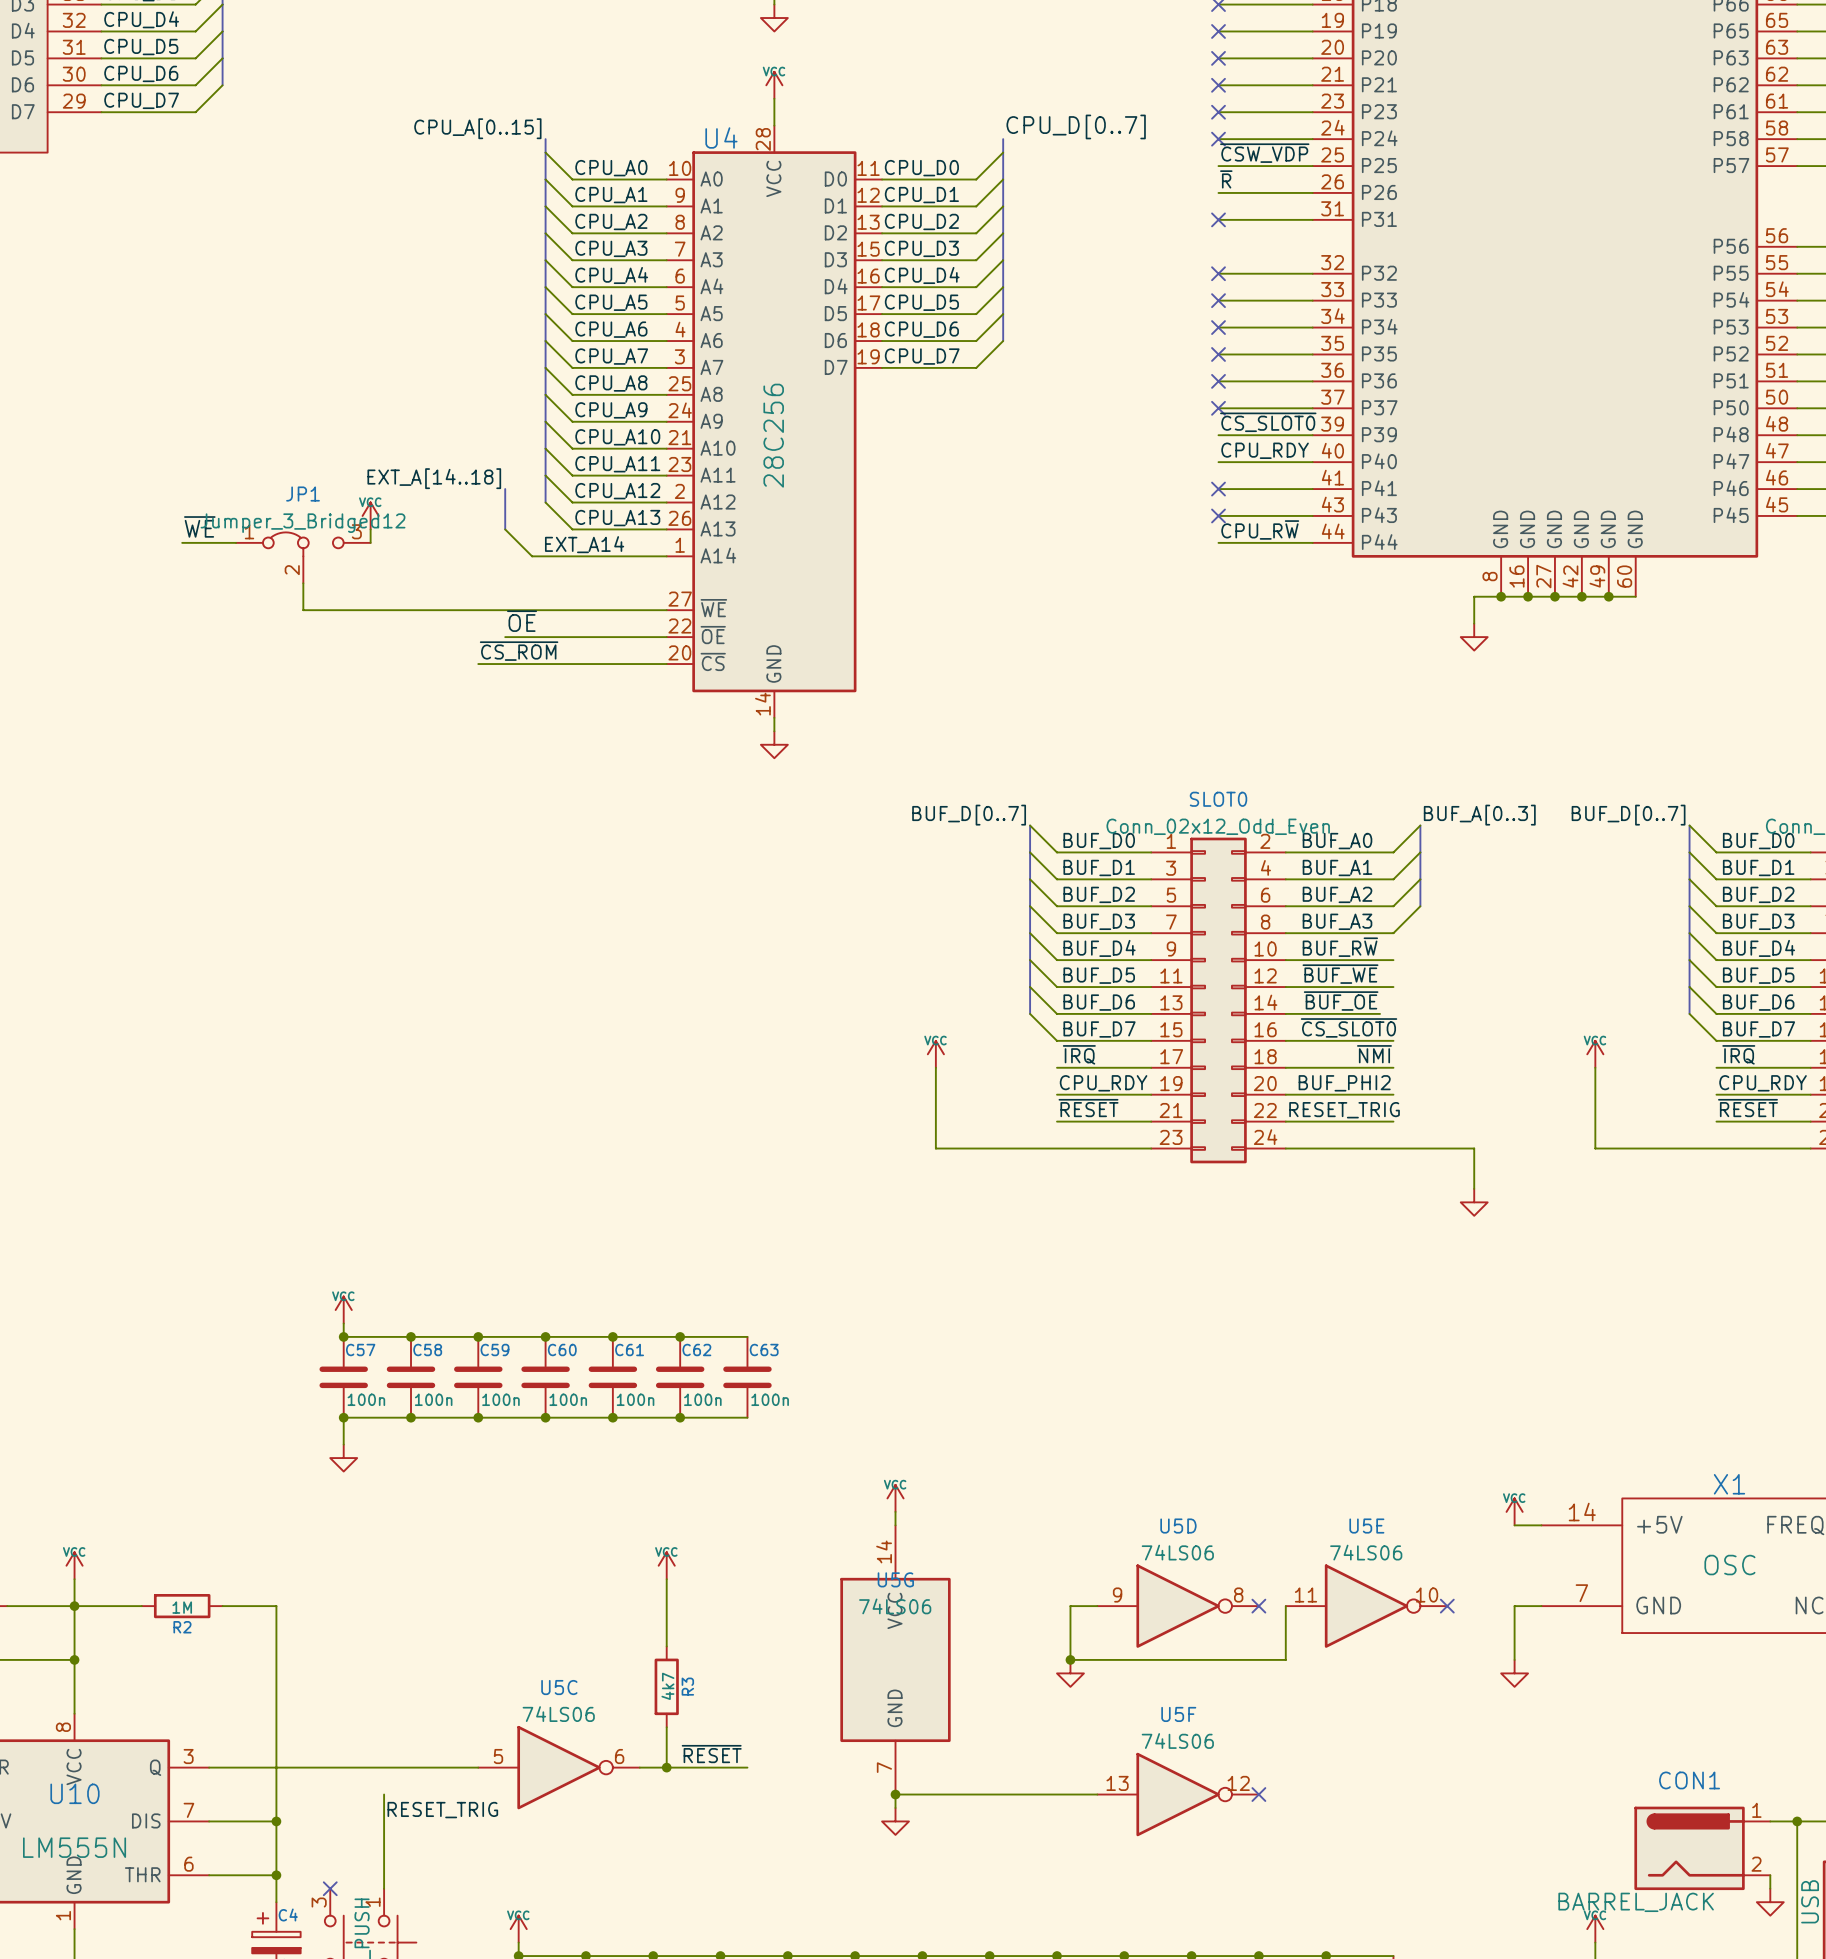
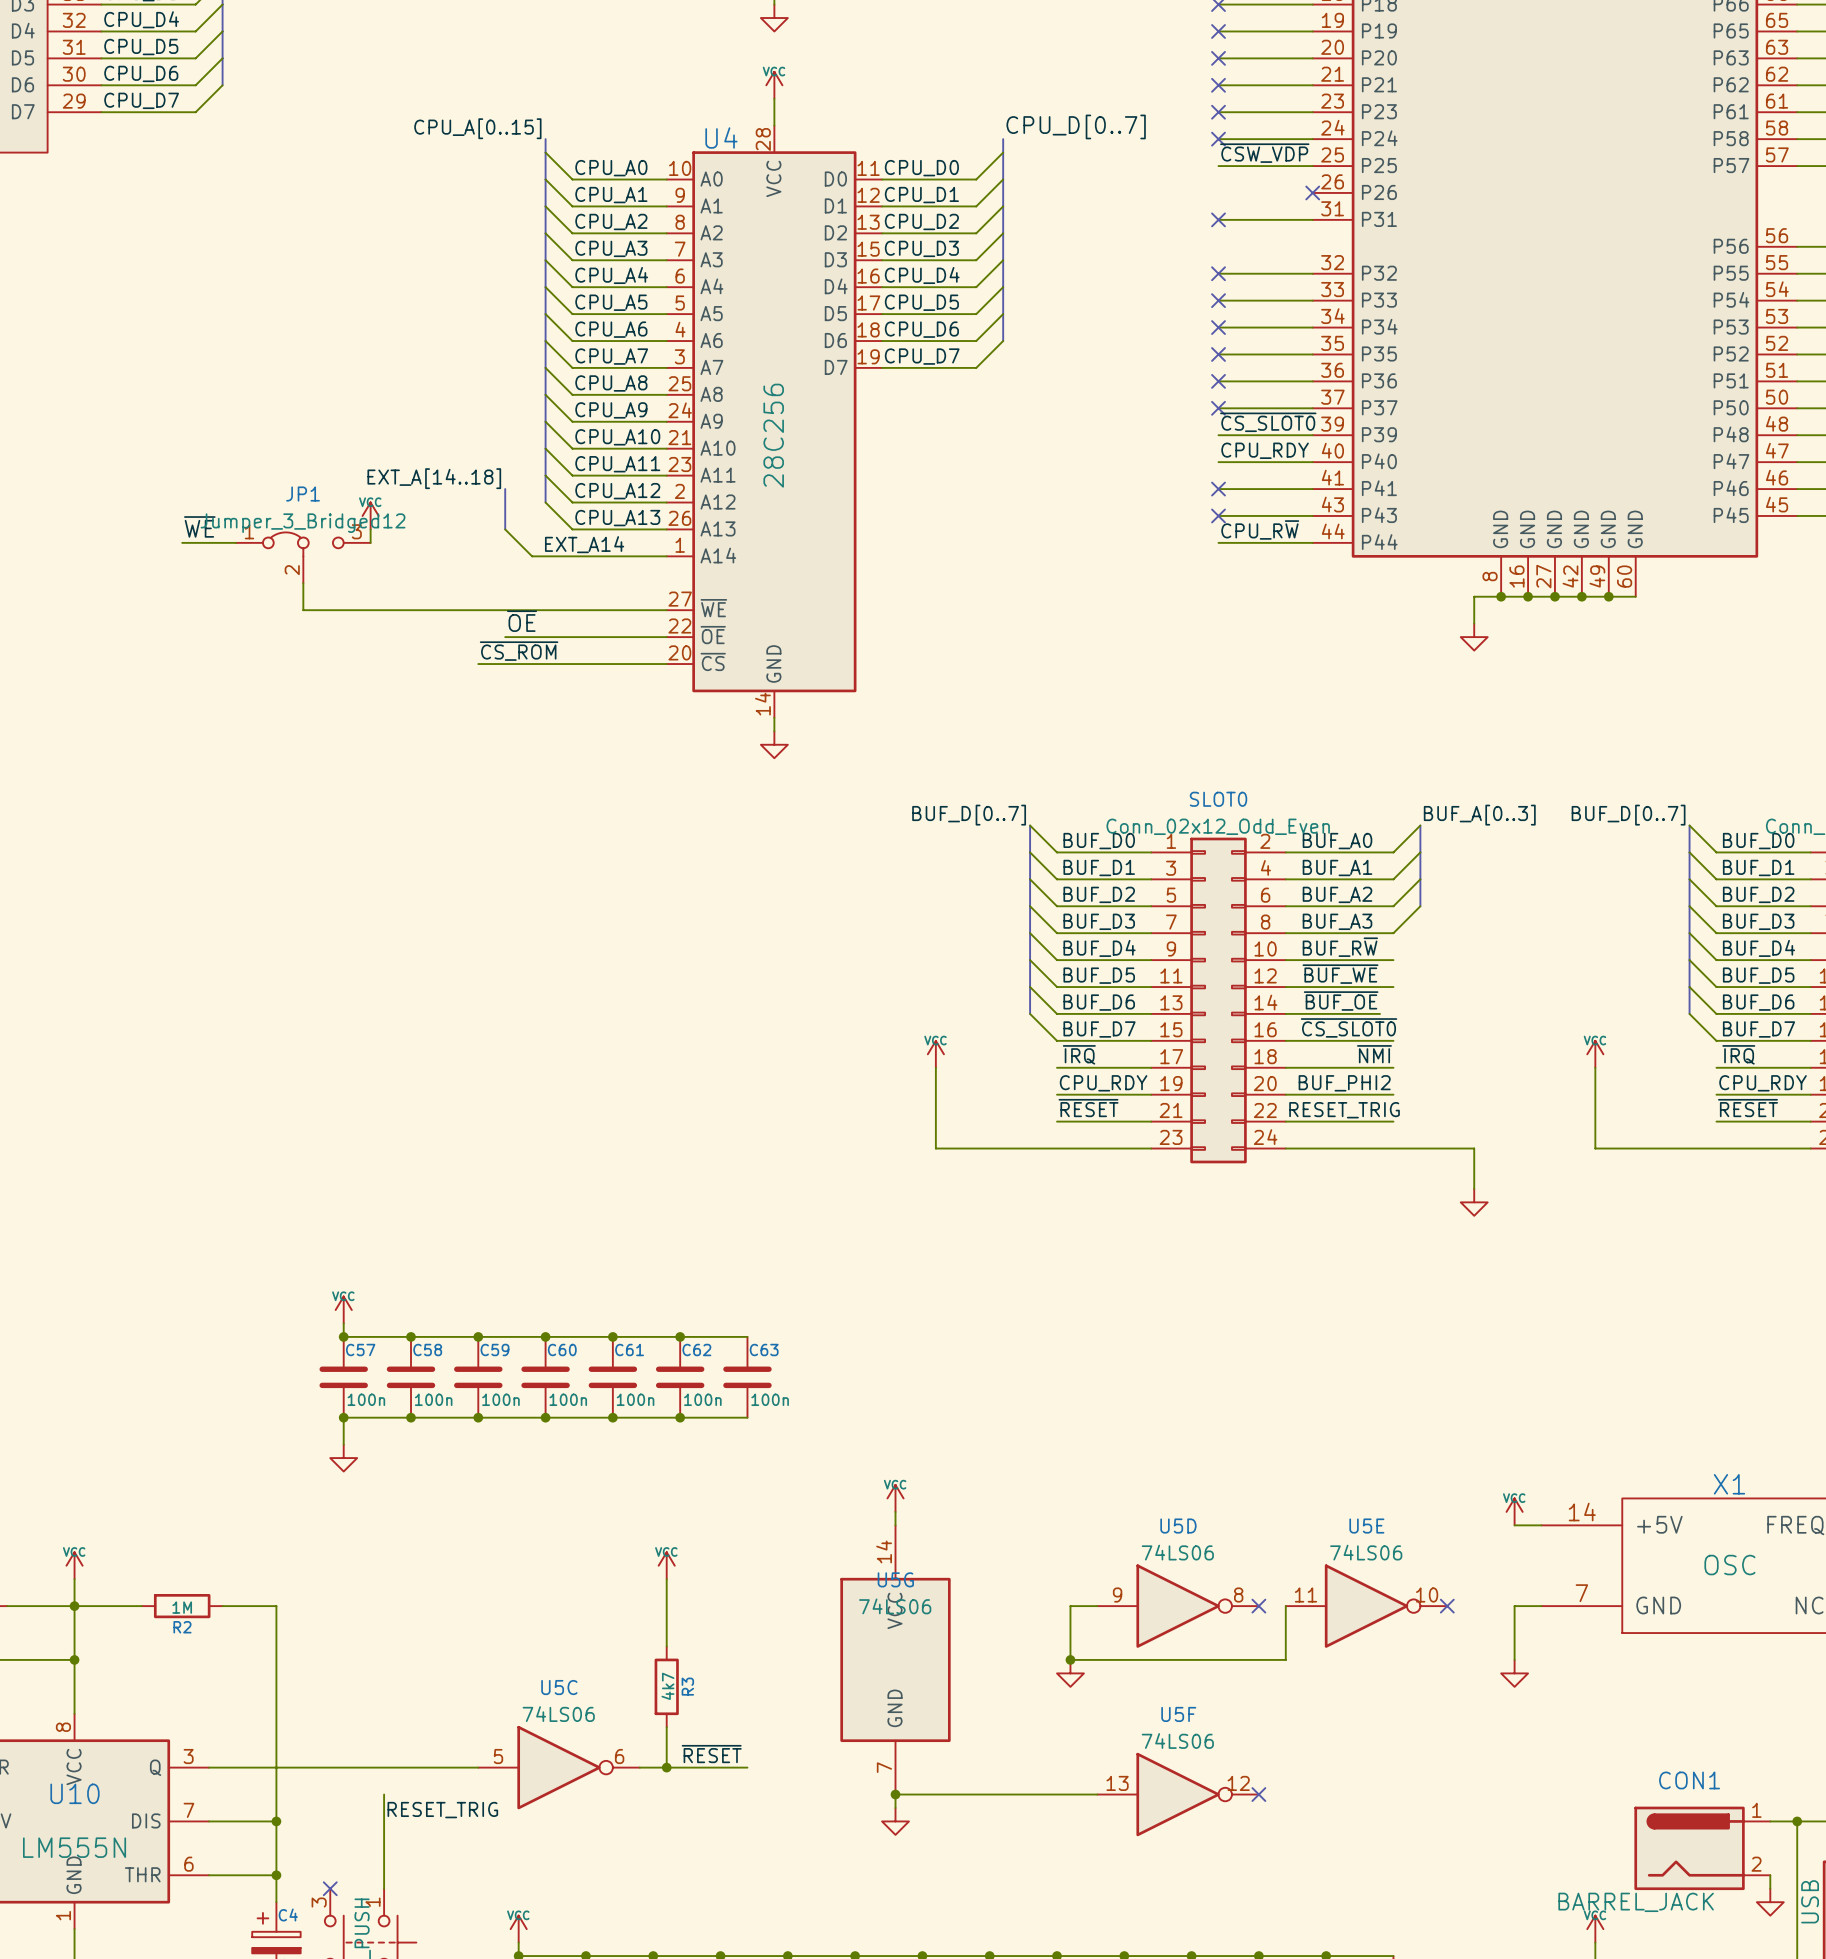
label: ~{R} (1226, 179) -> none
wire: (1218, 192) (1312, 192) -> none
no-connect mark: none -> (1312, 192)

